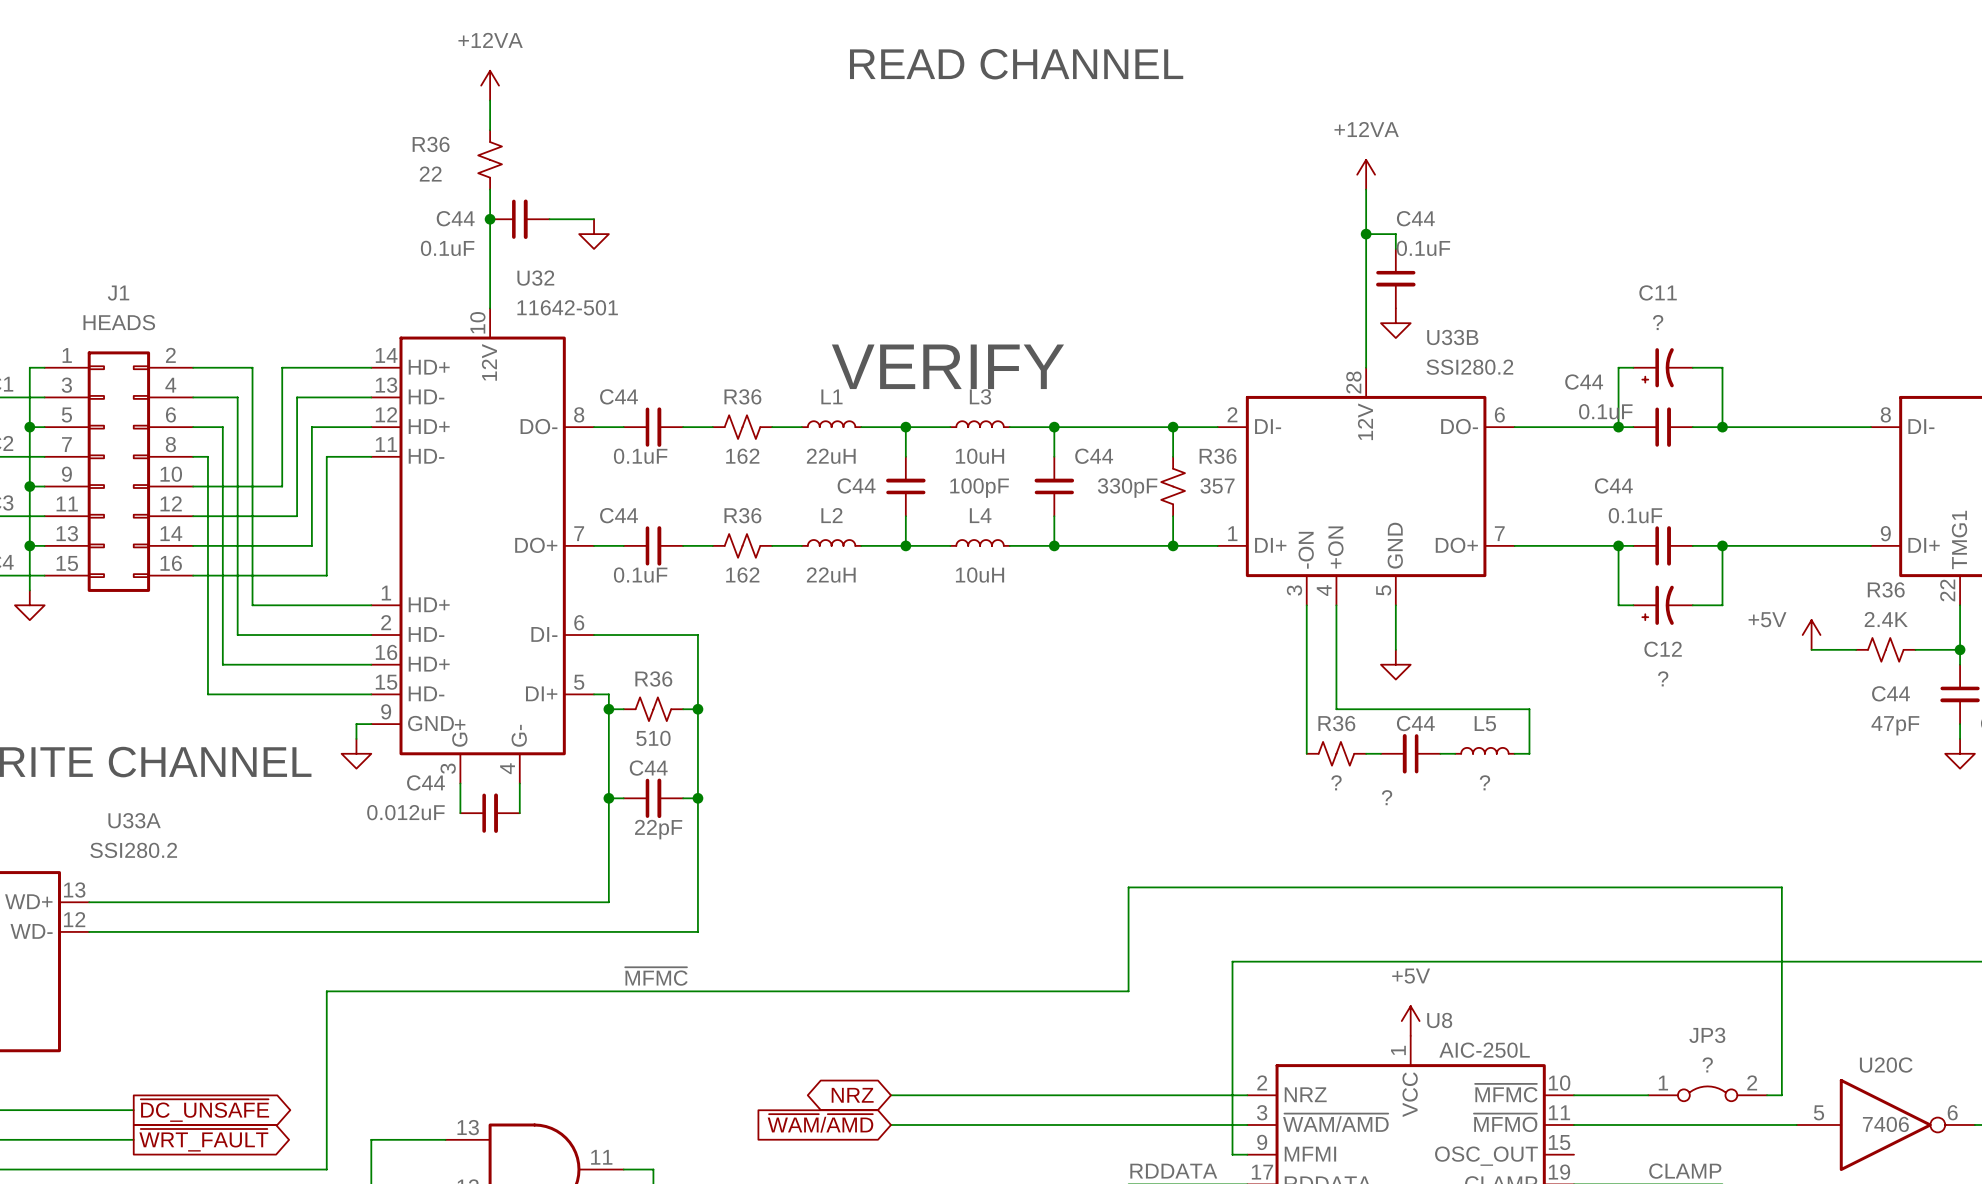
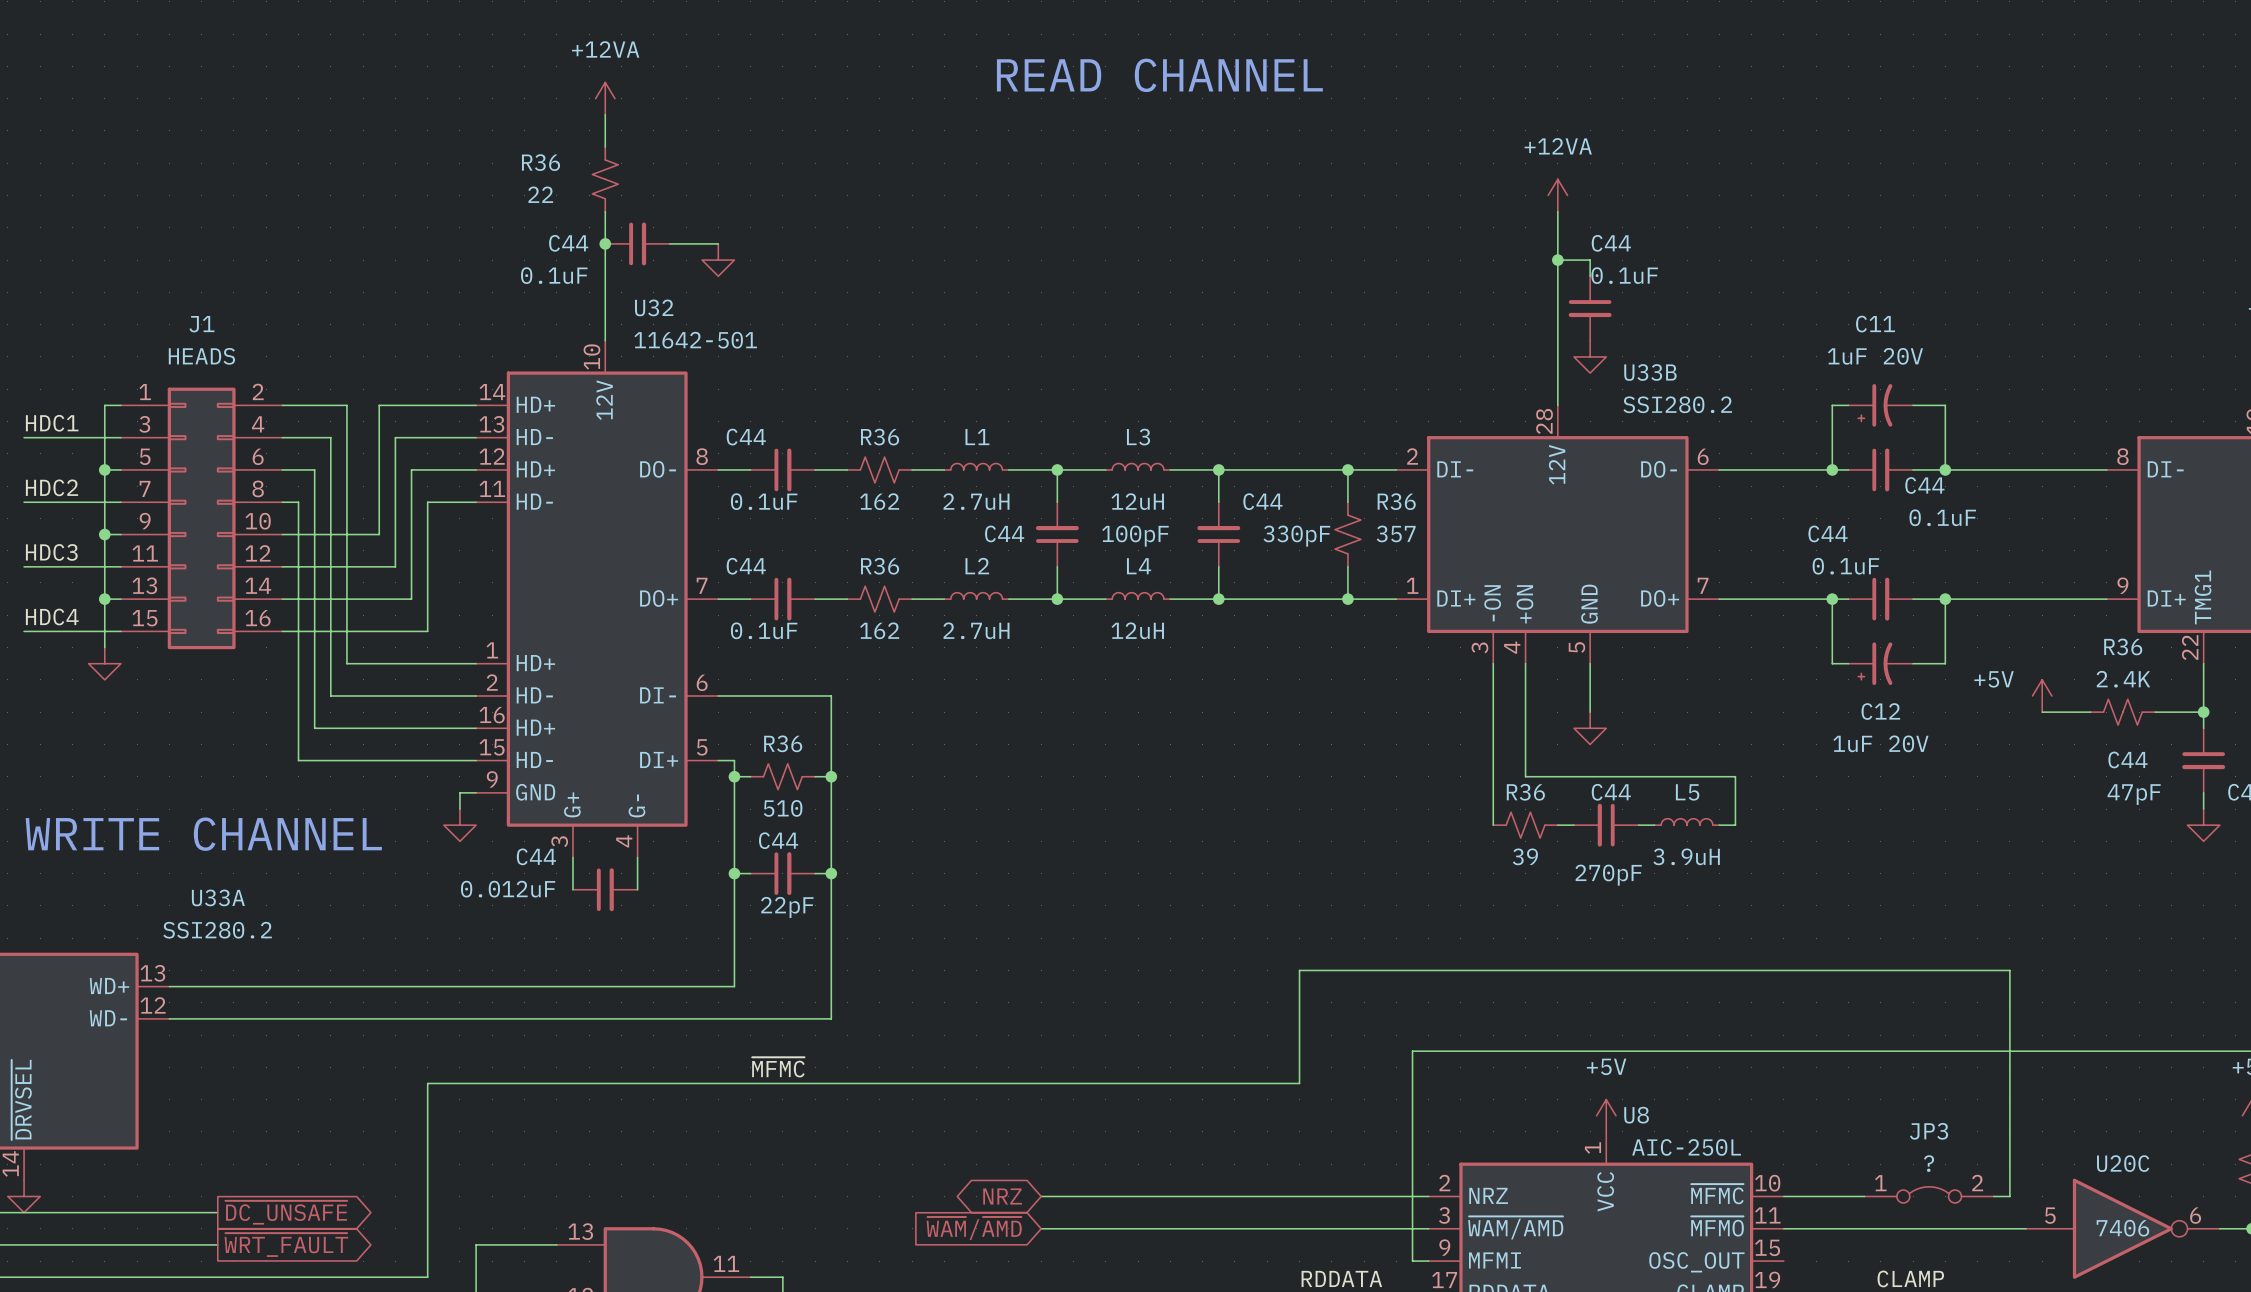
C11 value: ? (1658, 322) -> 1uF 20V (1875, 356)
text: VERIFY (947, 366) -> none
C44 name position: C44 (1584, 382) -> C44 (1924, 485)
C44 value position: 0.1uF (1605, 411) -> 0.1uF (1942, 517)
L1 value: 22uH (831, 456) -> 2.7uH (976, 501)
L3 value: 10uH (980, 456) -> 12uH (1137, 501)
L2 value: 22uH (831, 575) -> 2.7uH (976, 630)
L4 value: 10uH (980, 575) -> 12uH (1137, 630)
C12 value: ? (1663, 678) -> 1uF 20V (1880, 743)
R36 value: ? (1336, 782) -> 39 (1525, 856)
L5 value: ? (1484, 782) -> 3.9uH (1686, 856)
C44 value: ? (1387, 797) -> 270pF (1608, 875)

